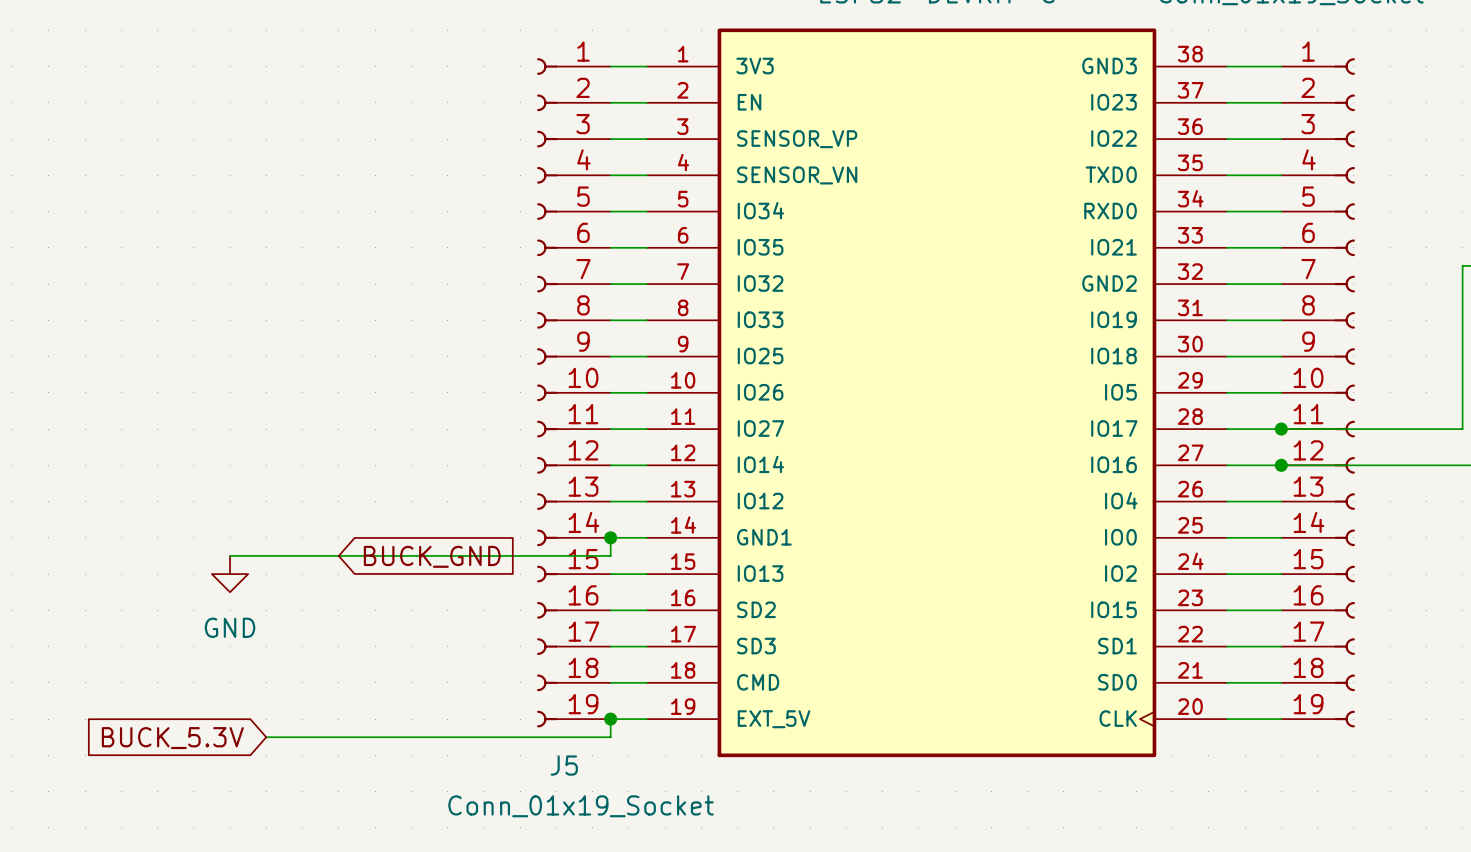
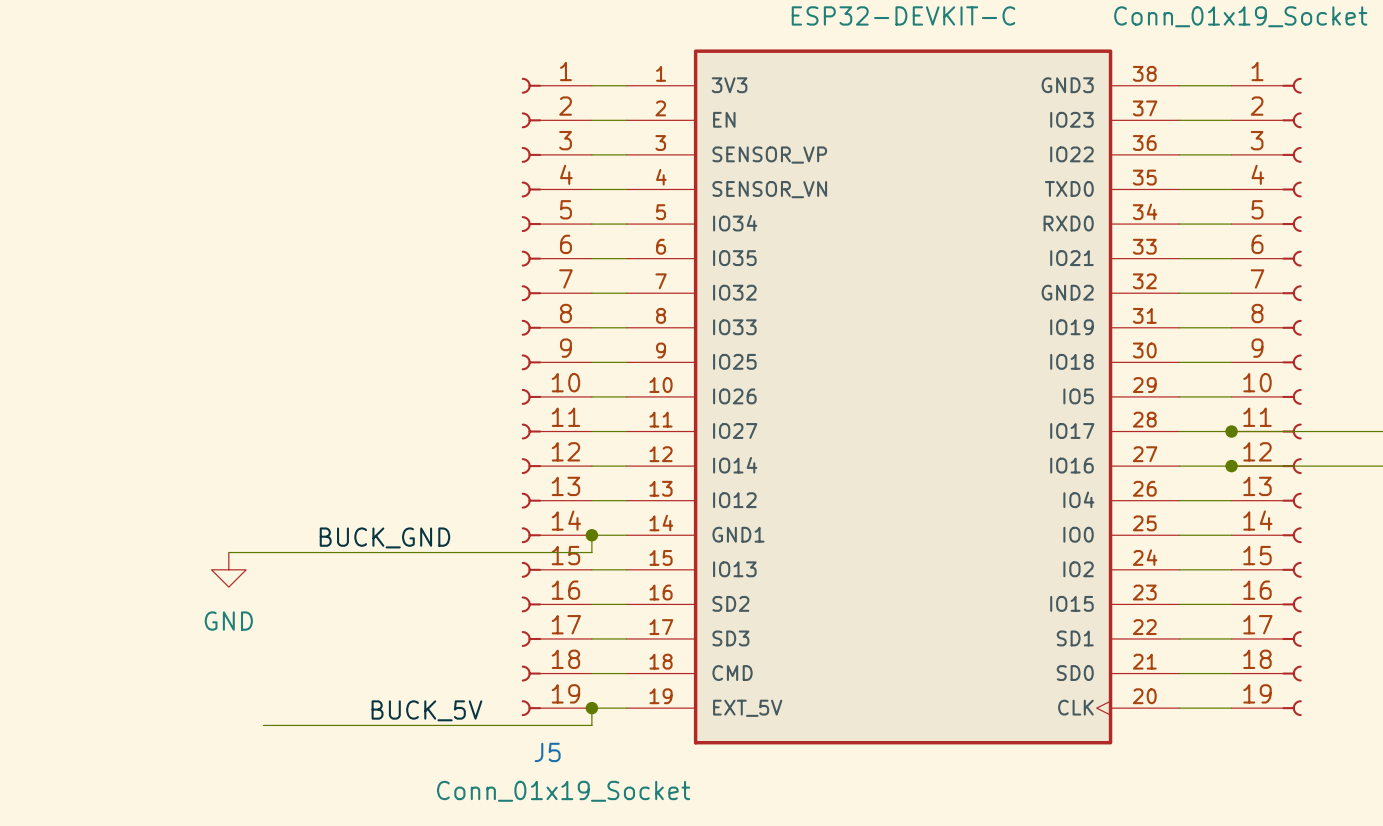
label: none -> BUCK_GND (384, 537)
global label: BUCK_GND (432, 556) -> none
label: none -> BUCK_5V (426, 710)
global label: BUCK_5.3V (172, 738) -> none

